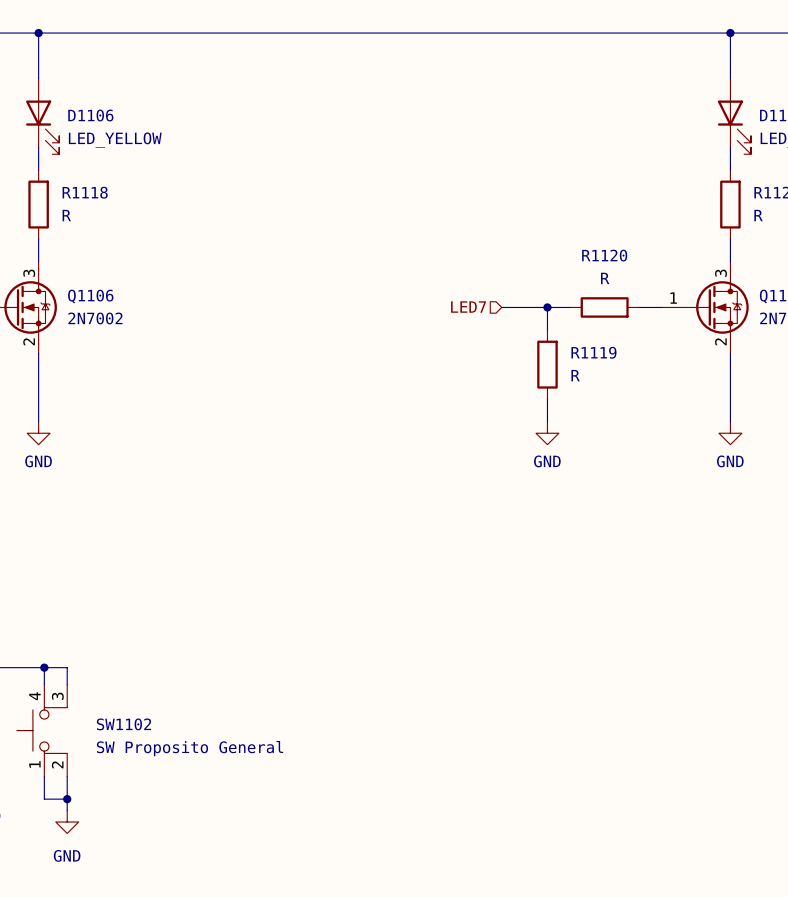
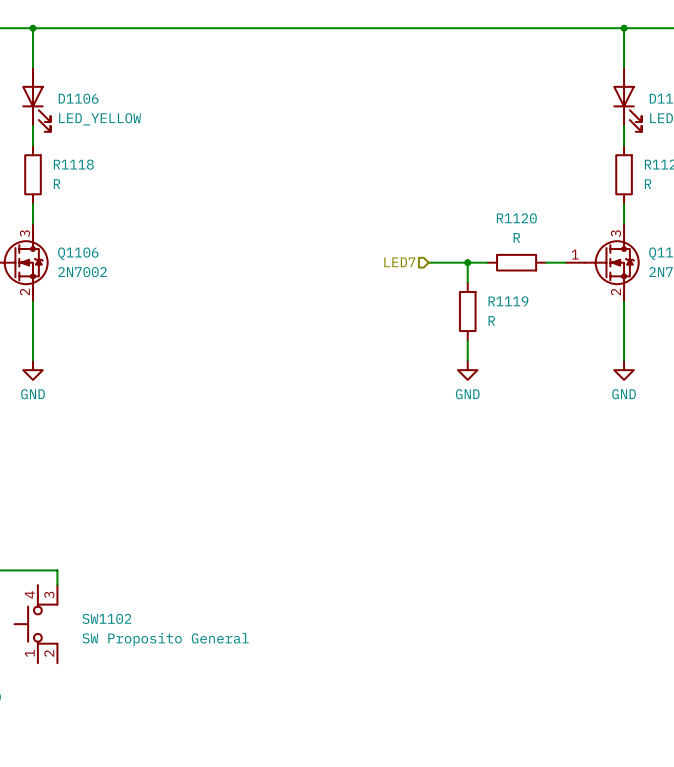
wire: (44, 667) (44, 684) -> none
junction: (44, 667) -> none
wire: (44, 776) (44, 799) (67, 799) -> none
wire: (67, 776) (67, 810) -> none
junction: (67, 799) -> none
power symbol: GND (67, 822) -> none

